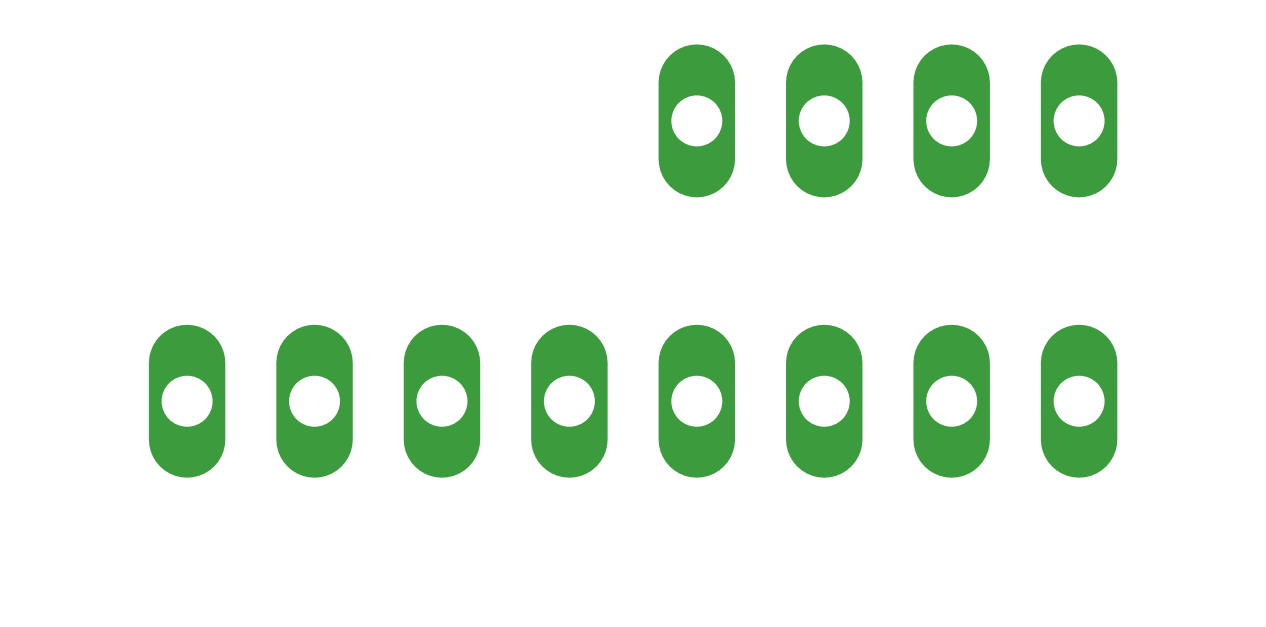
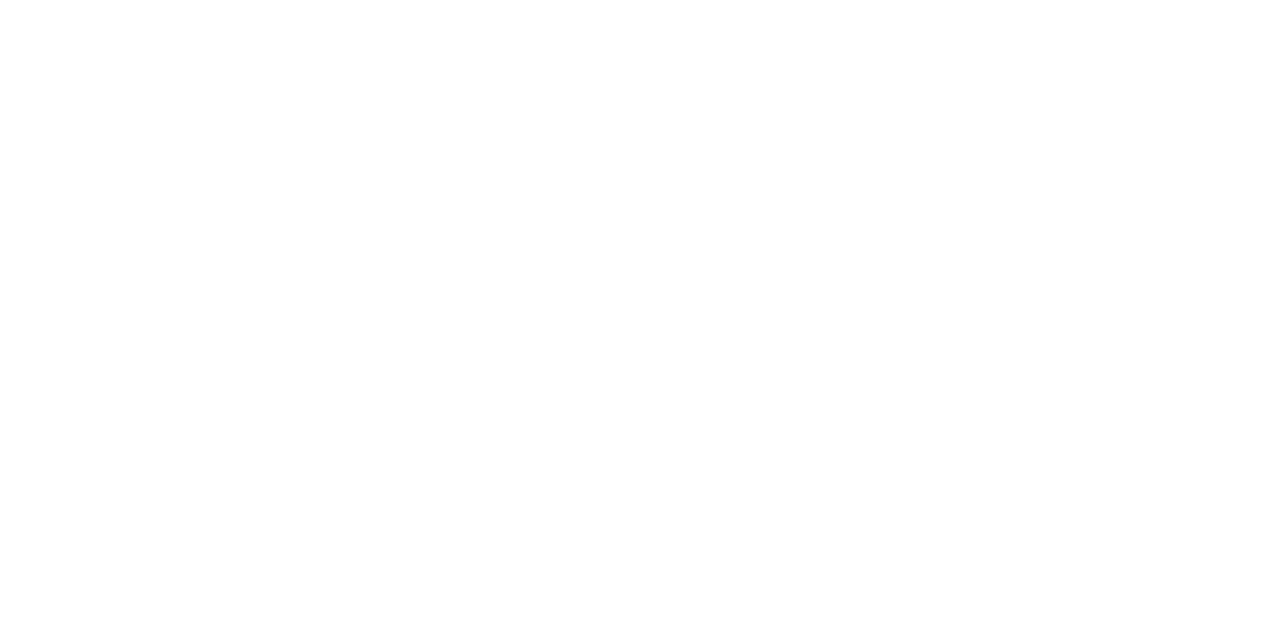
part: (887, 120) -> none
part: (633, 401) -> none

